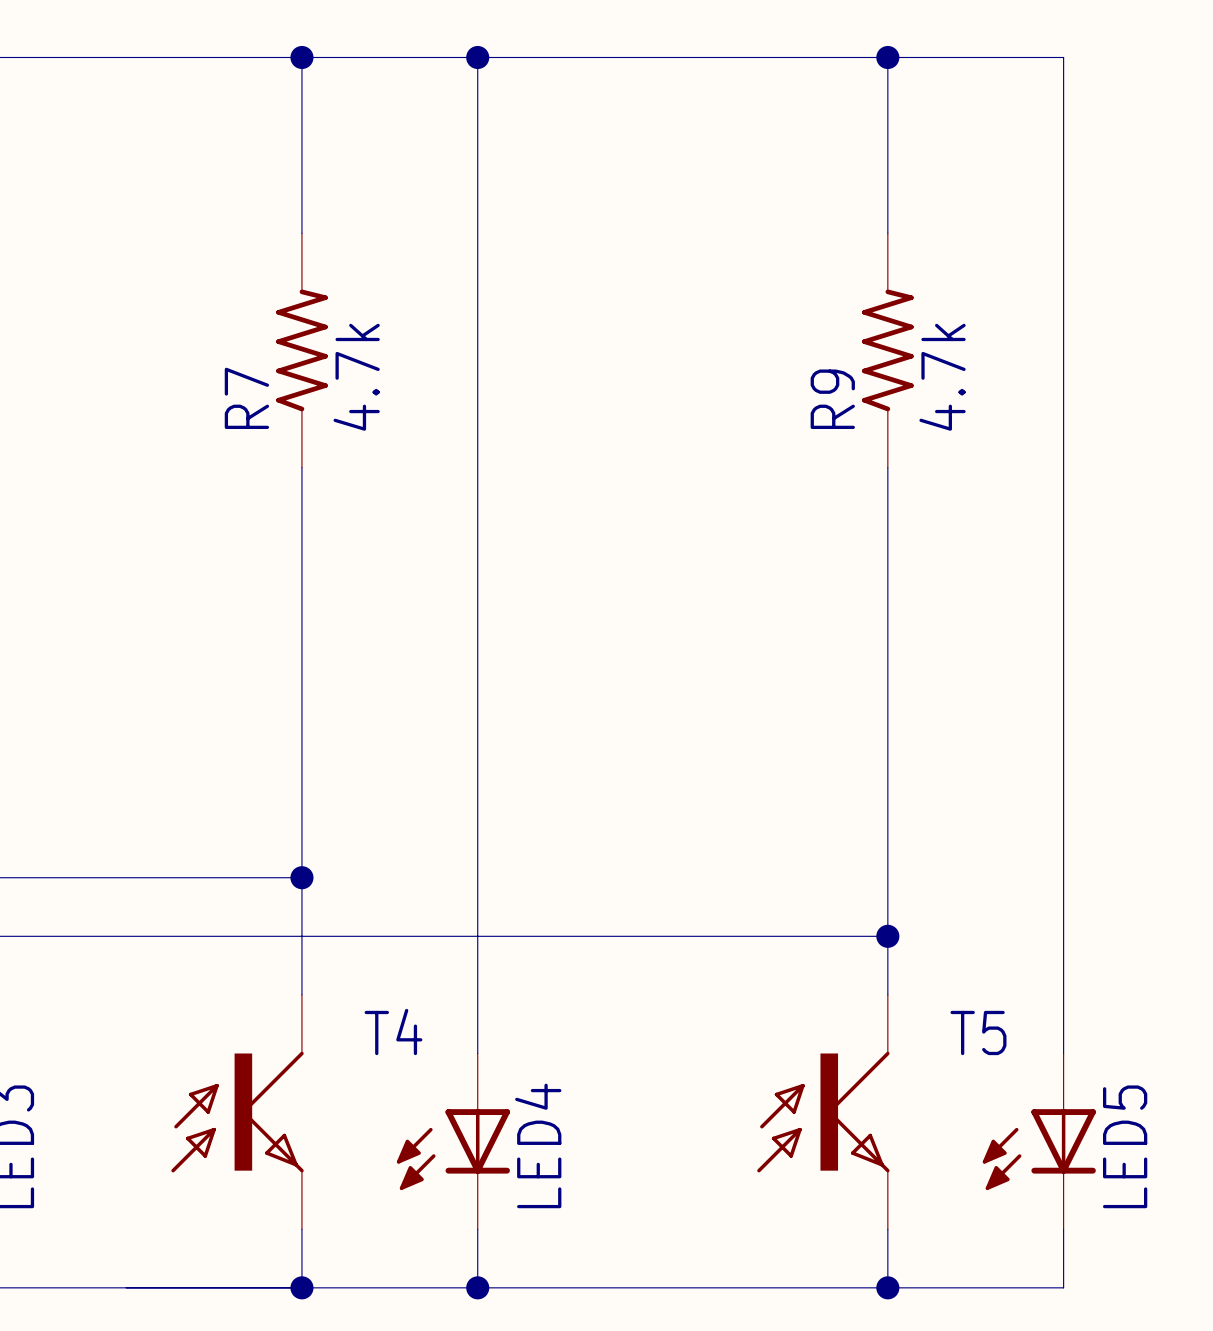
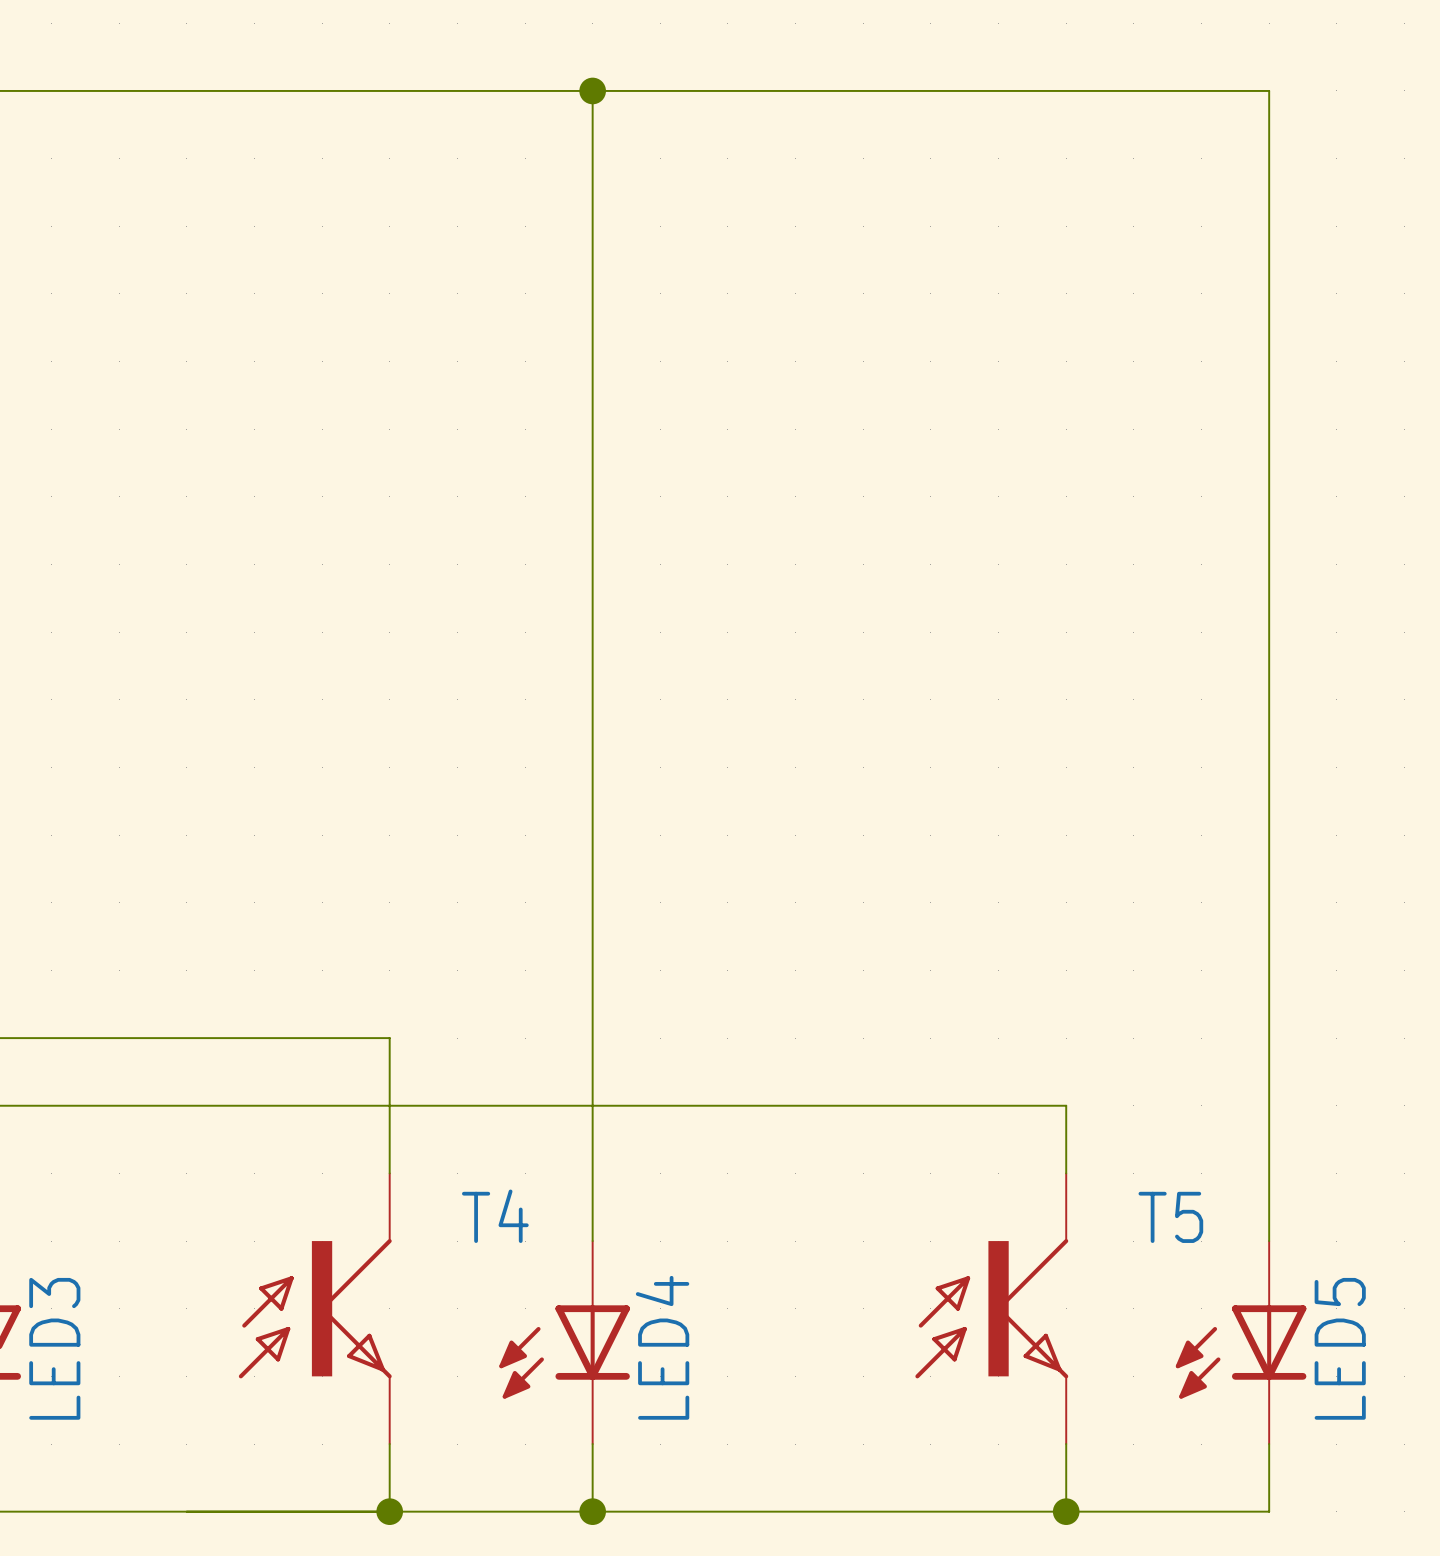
wire: (301, 57) (301, 233) -> none
junction: (301, 57) -> none
wire: (887, 57) (887, 233) -> none
junction: (887, 57) -> none
R7: 4.7k (301, 350) -> none
R9: 4.7k (887, 350) -> none
wire: (301, 467) (301, 877) -> none
wire: (887, 467) (887, 936) -> none
junction: (301, 877) -> none
junction: (887, 936) -> none

